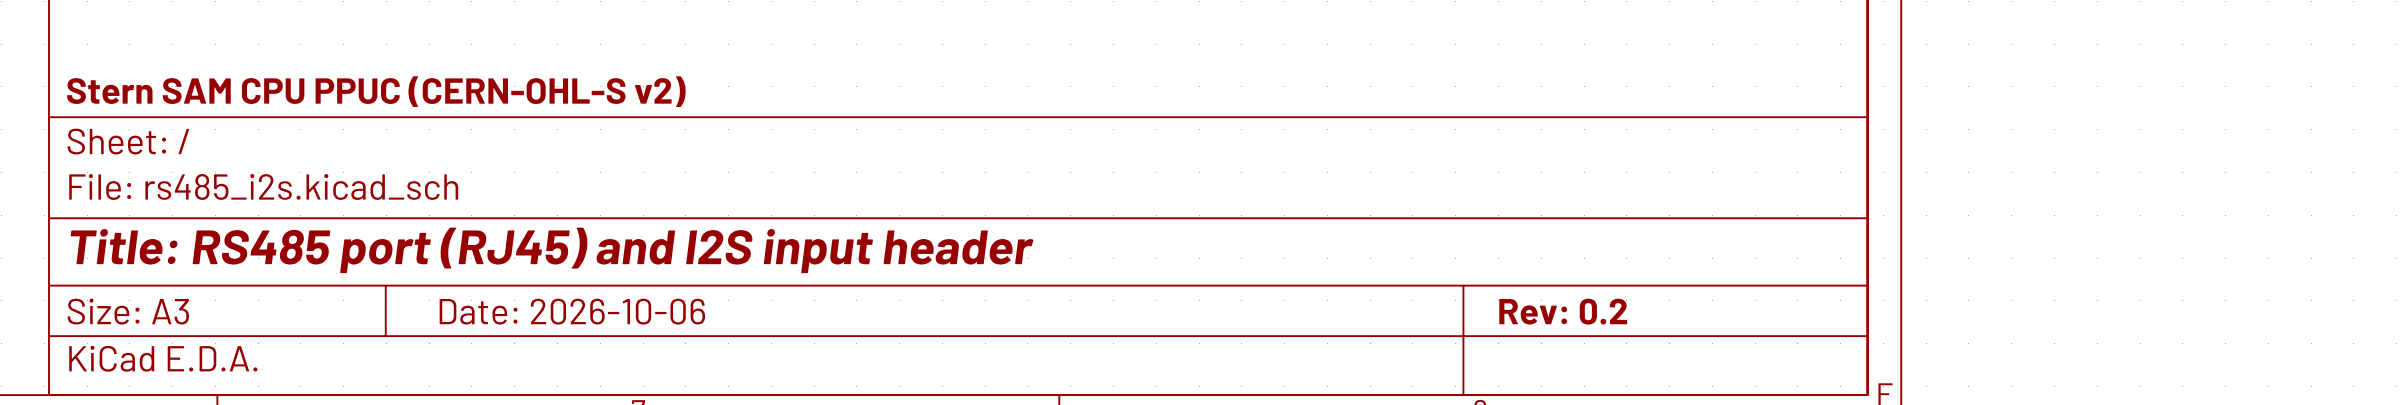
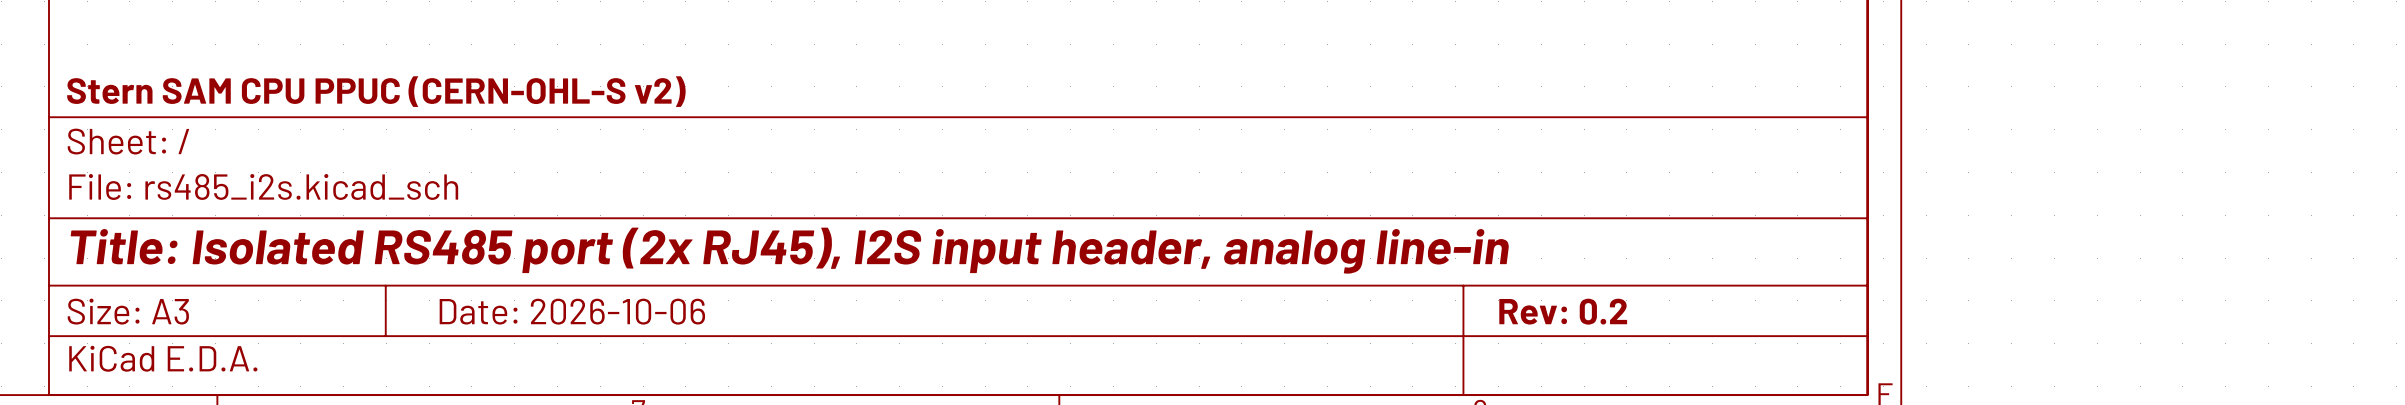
title block: Title: RS485 port (RJ45) and I2S input header (552, 250) -> Title: Isolated RS485 port (2x RJ45), I2S input header, analog line-in (789, 250)

